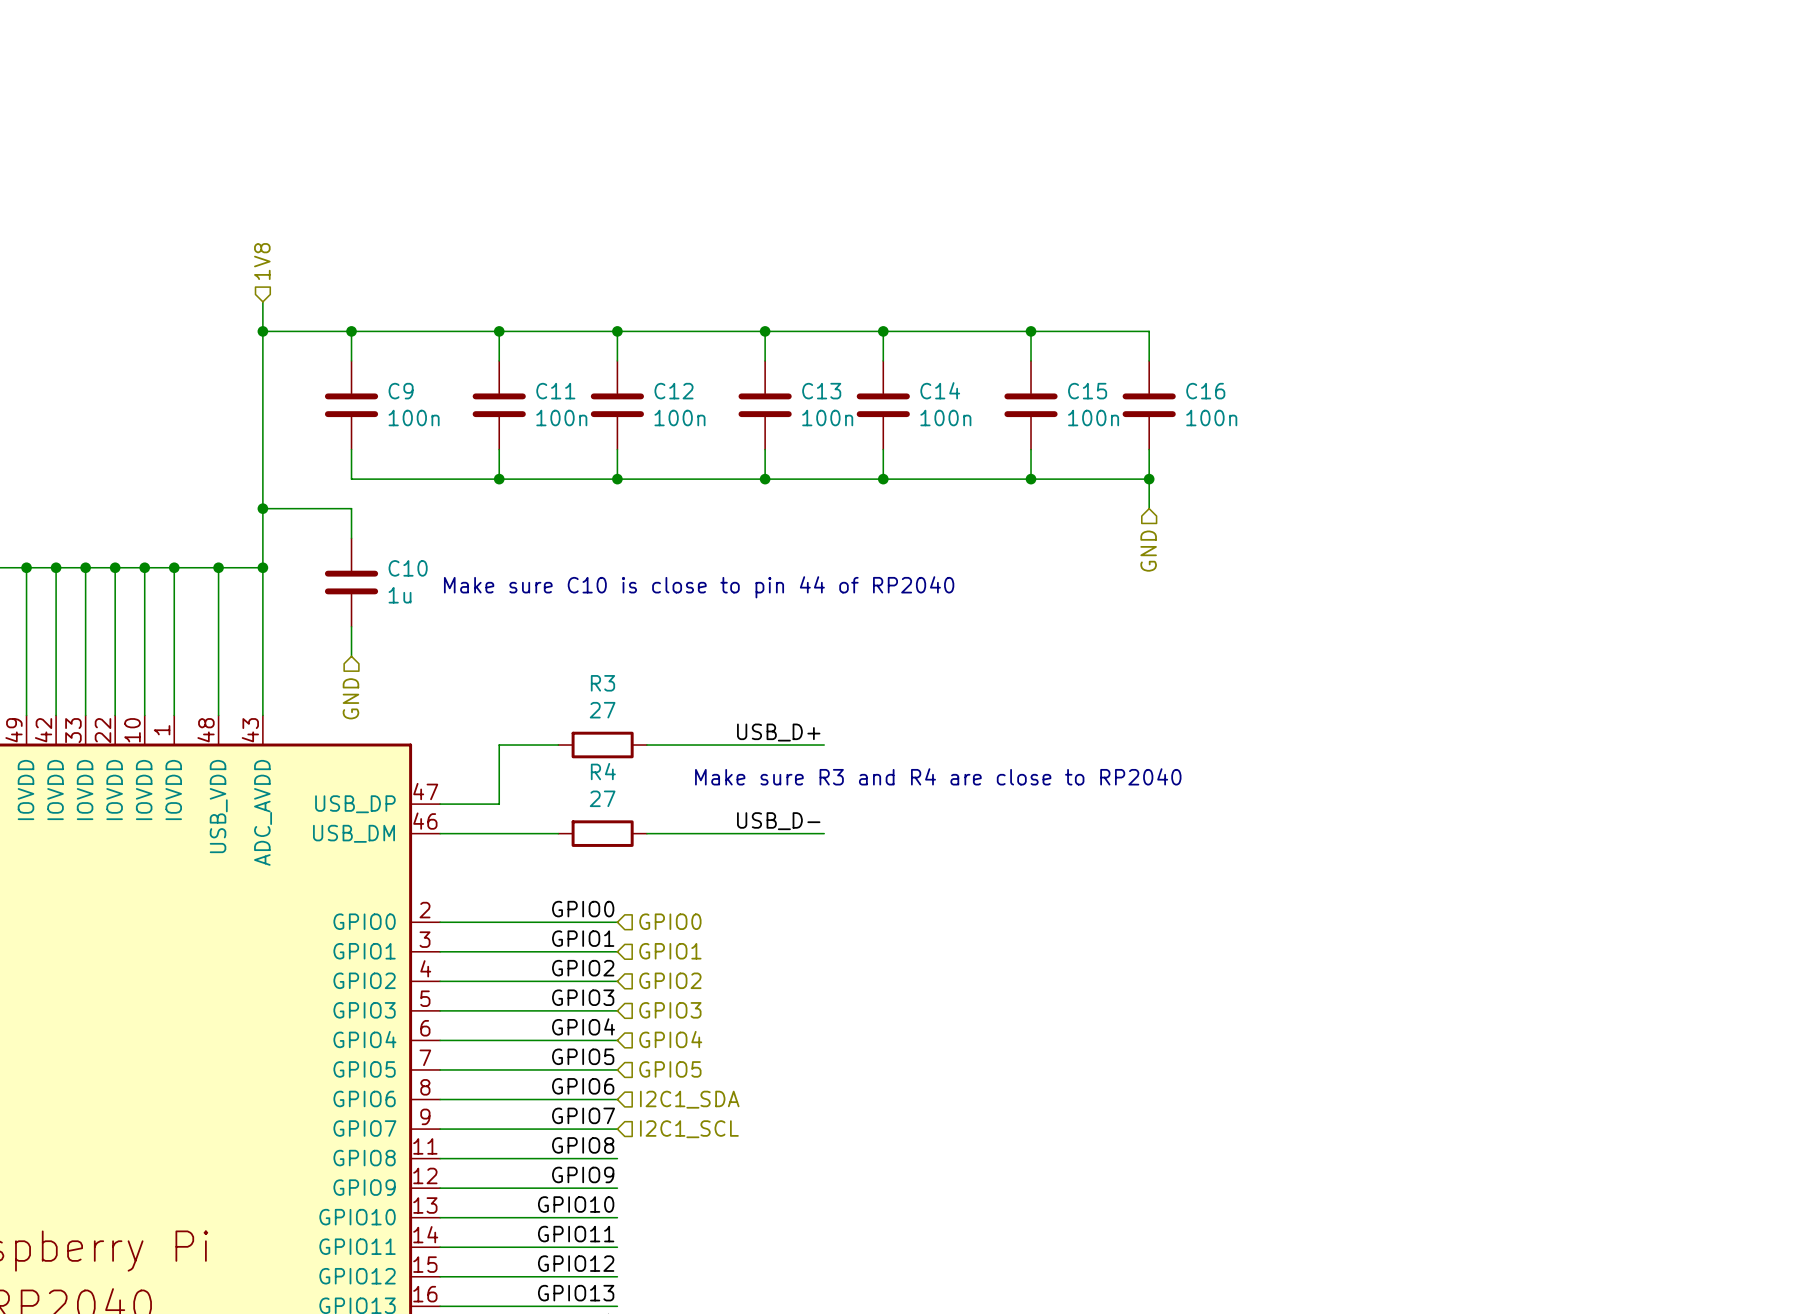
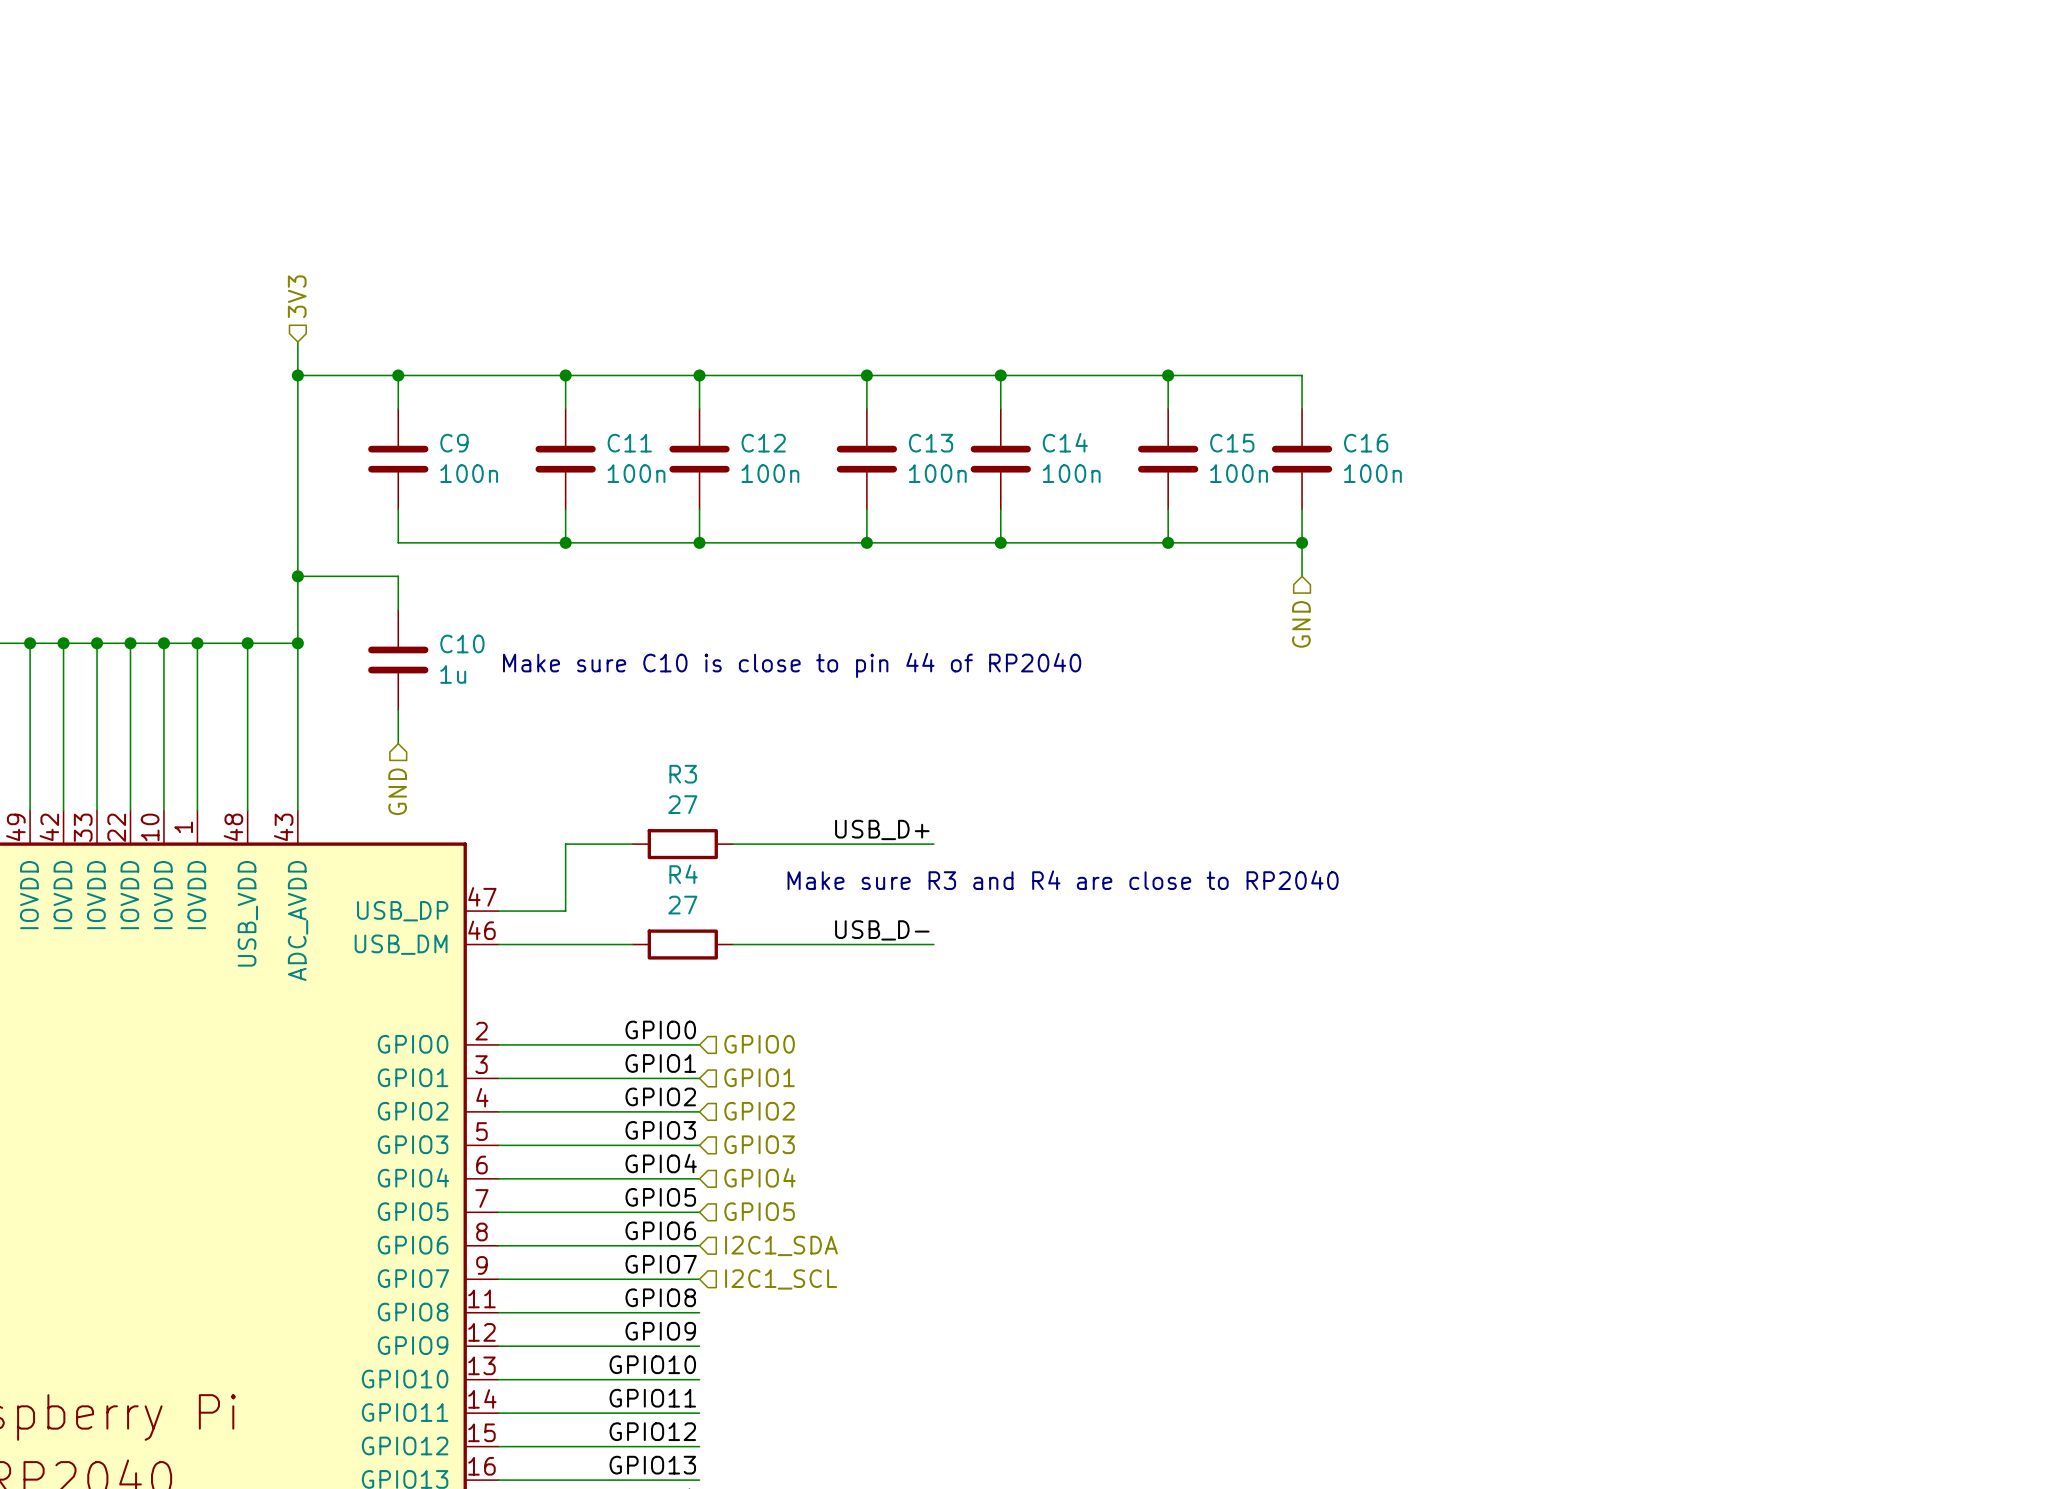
hierarchical label: 1V8 (262, 261) -> 3V3 (297, 296)

